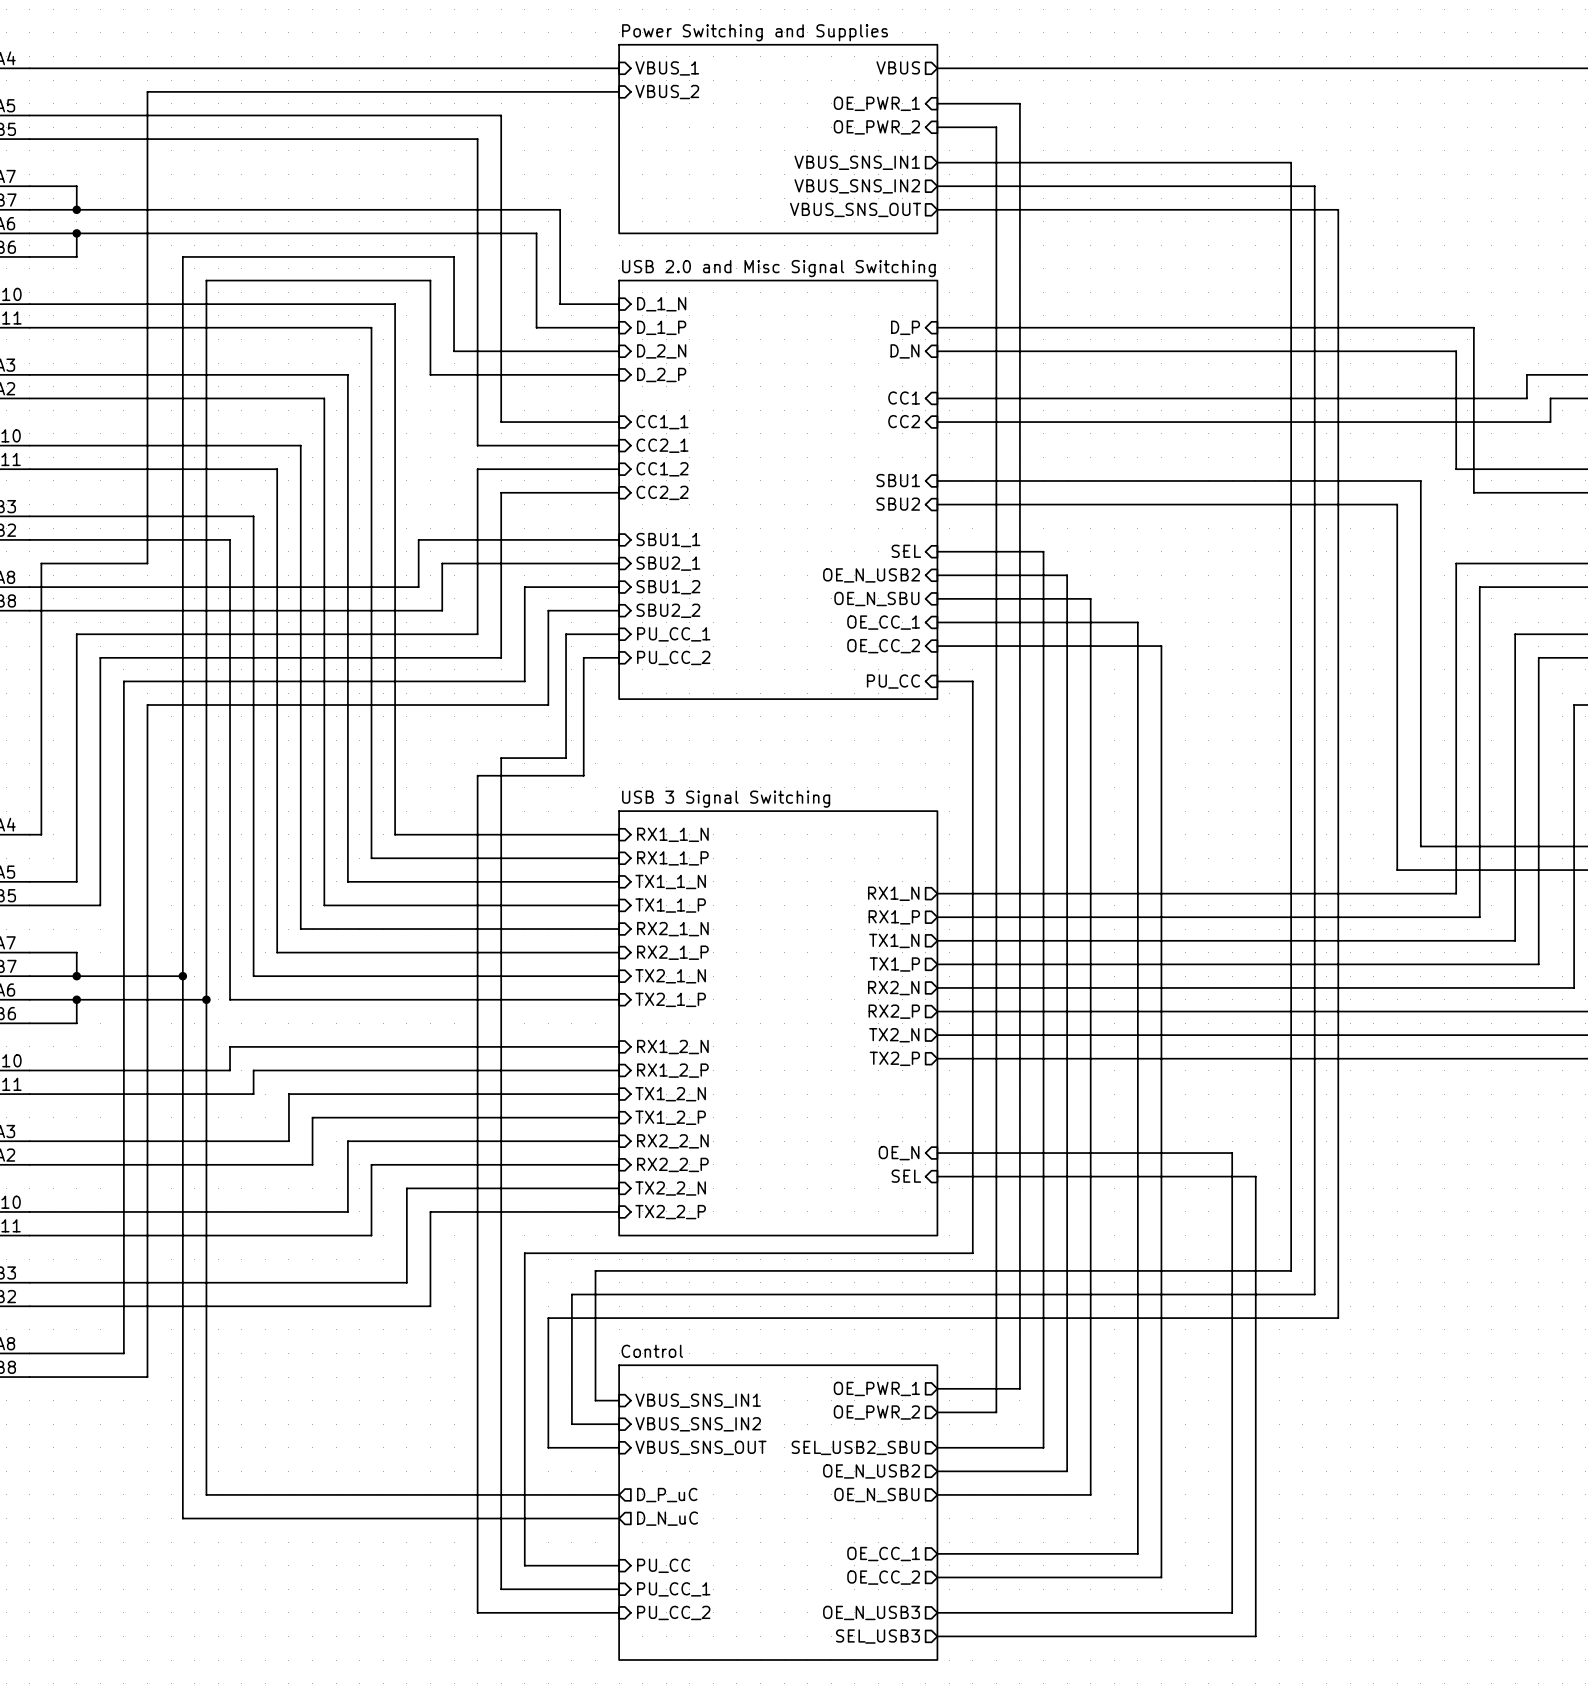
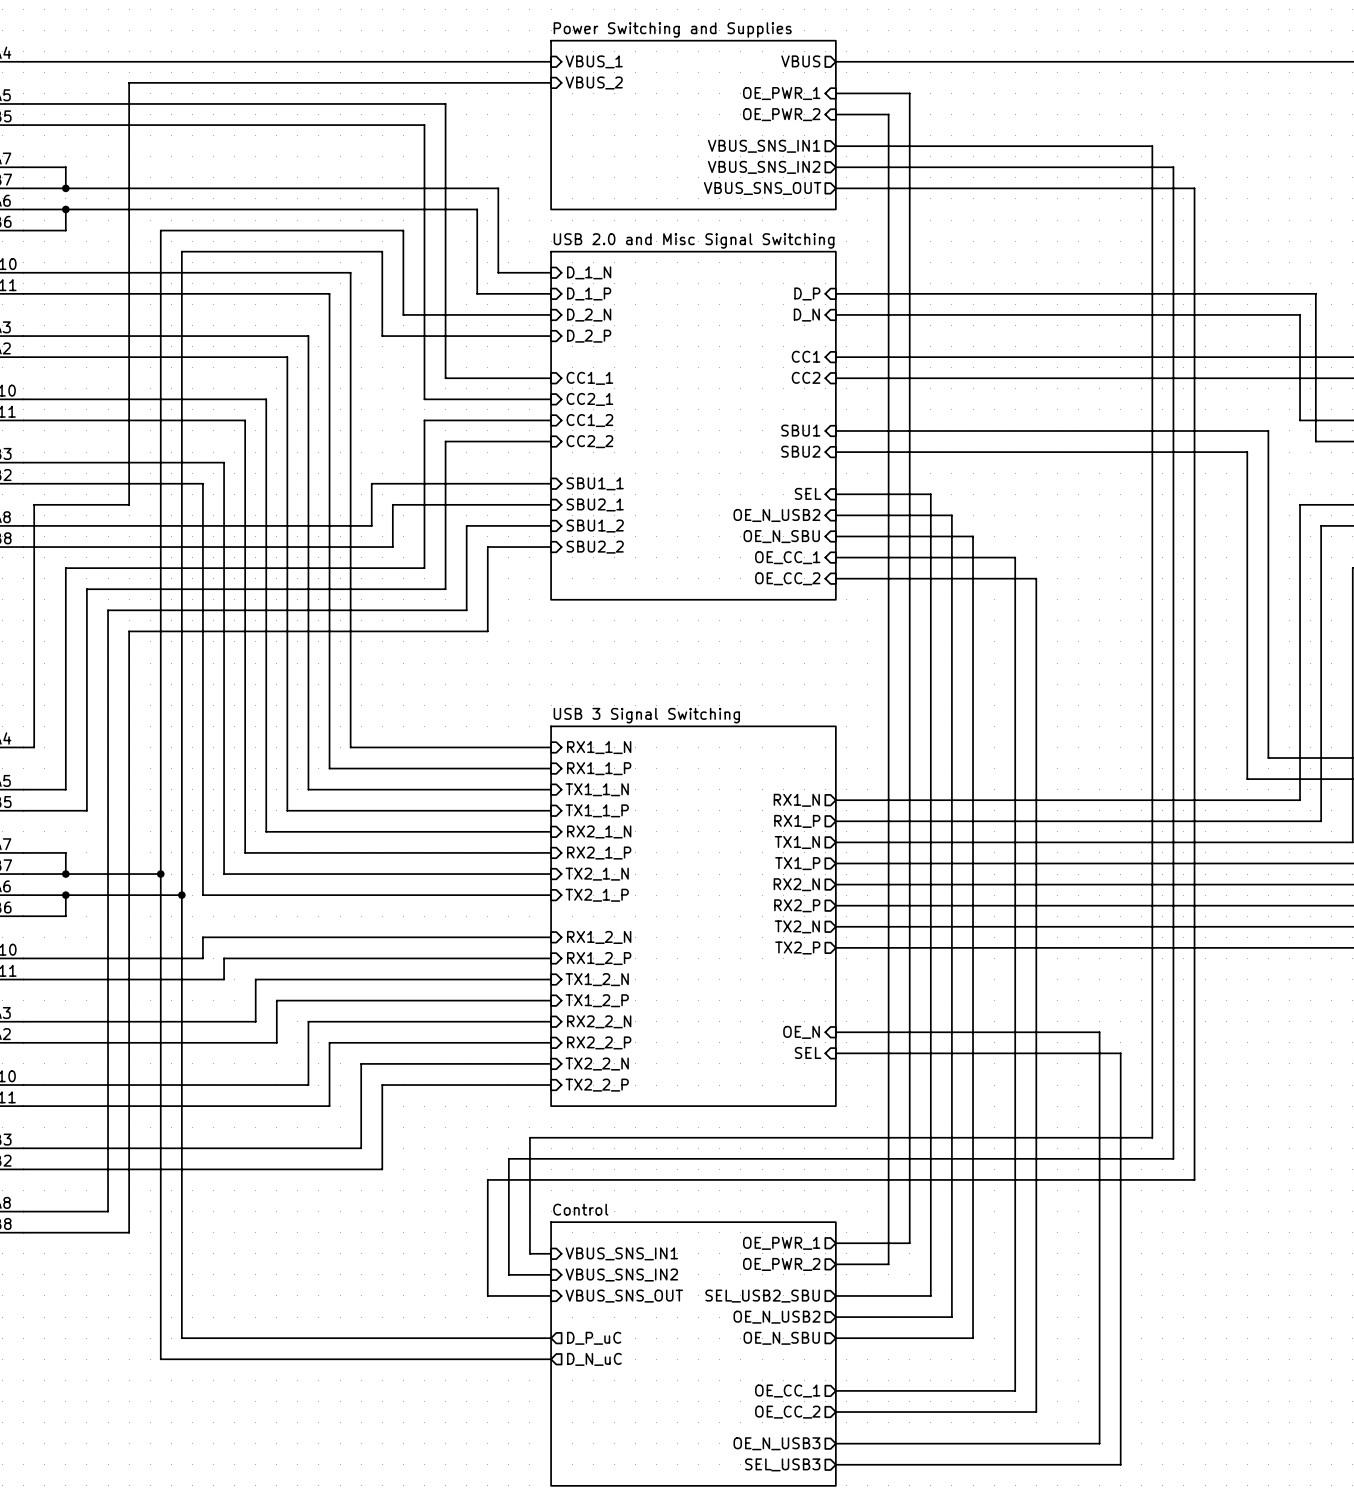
sheet USB 2.0 and Misc Signal Switching shape: [619, 280, 938, 700] -> [551, 251, 836, 600]
wire: (619, 634) (566, 634) (566, 758) (501, 758) (501, 1589) (619, 1589) -> none
sheet pin: PU_CC_1 (673, 634) -> none
wire: (619, 657) (583, 657) (583, 775) (477, 775) (477, 1612) (619, 1612) -> none
sheet pin: PU_CC_2 (673, 657) -> none
sheet pin: PU_CC (893, 681) -> none
wire: (937, 681) (972, 681) (972, 1253) (524, 1253) (524, 1565) (619, 1565) -> none
sheet pin: PU_CC (663, 1565) -> none
sheet pin: PU_CC_1 (673, 1589) -> none
sheet pin: PU_CC_2 (673, 1612) -> none

